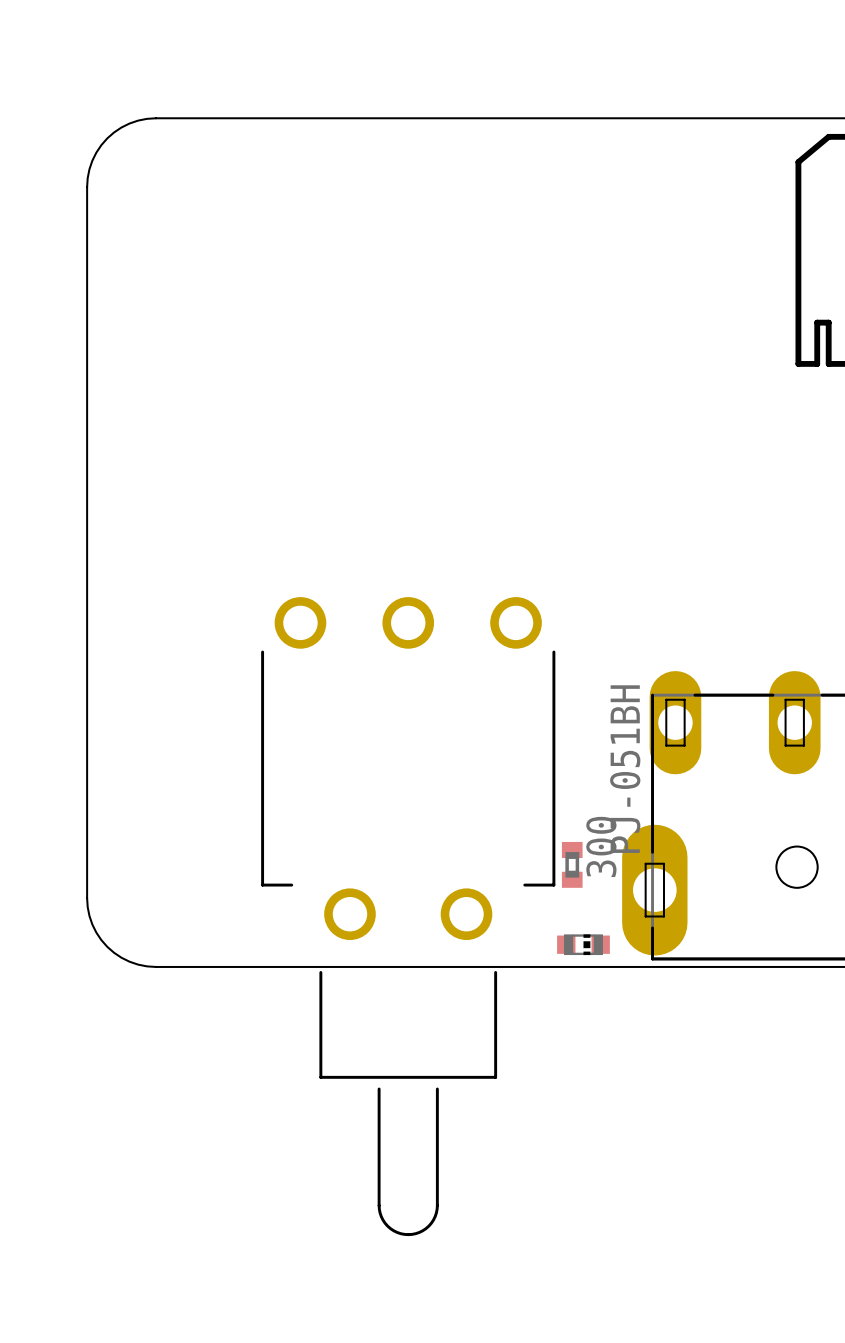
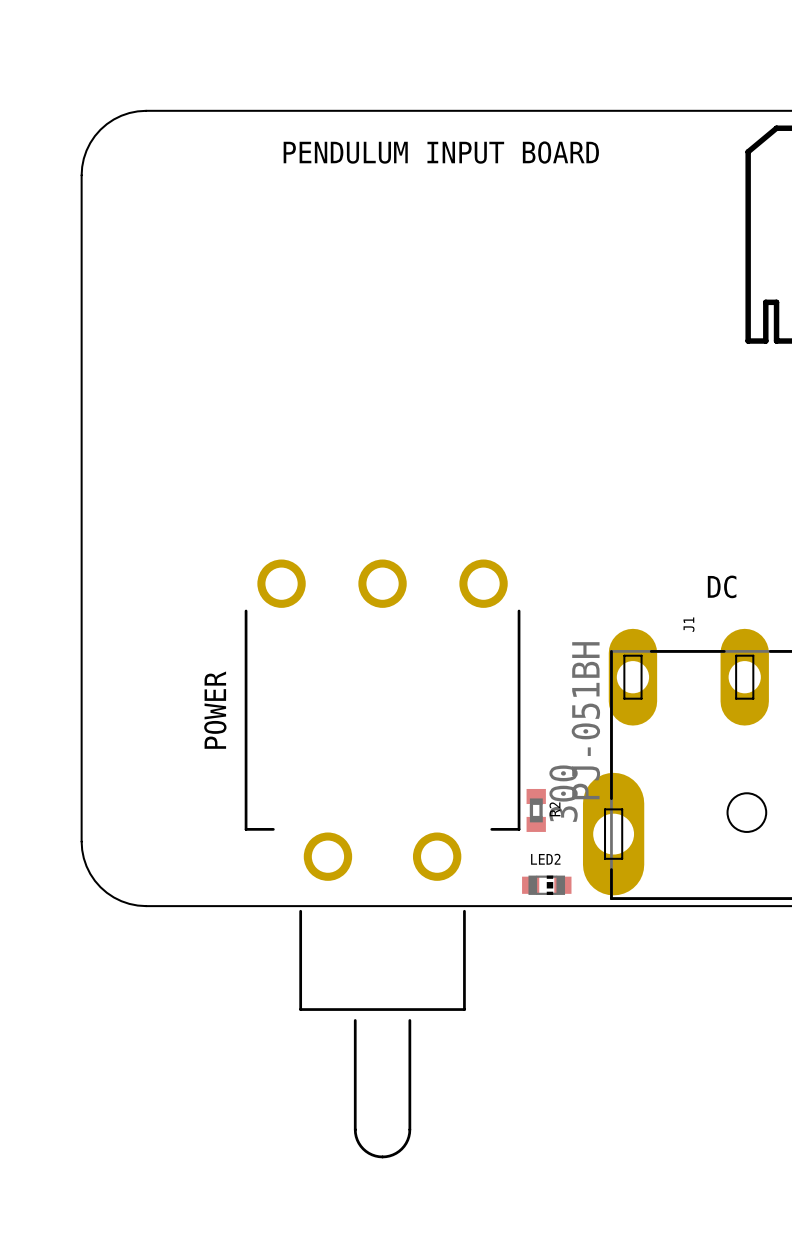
text: none -> PENDULUM INPUT BOARD (441, 152)
text: none -> DC (722, 586)
J1 name: none -> J1 (689, 624)
text: none -> POWER (215, 710)
R2 name: none -> R2 (554, 809)
LED2 name: none -> LED2 (545, 859)

